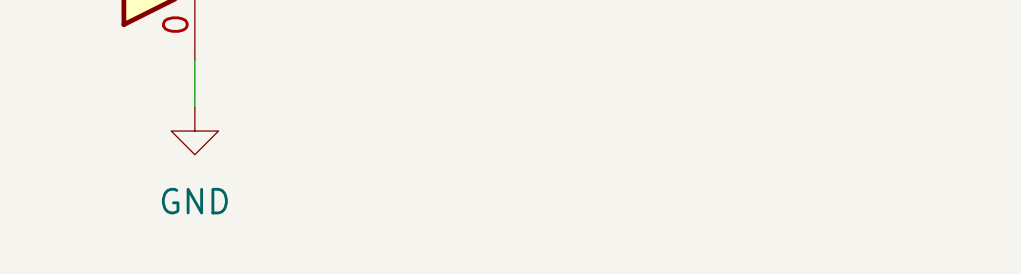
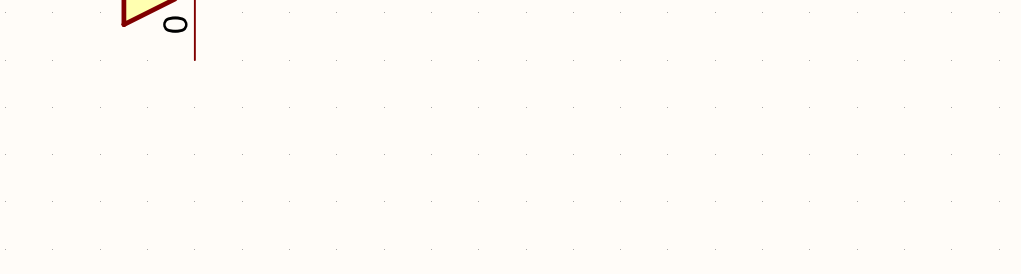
wire: (194, 60) (194, 107) -> none
power symbol: GND (194, 131) -> none

